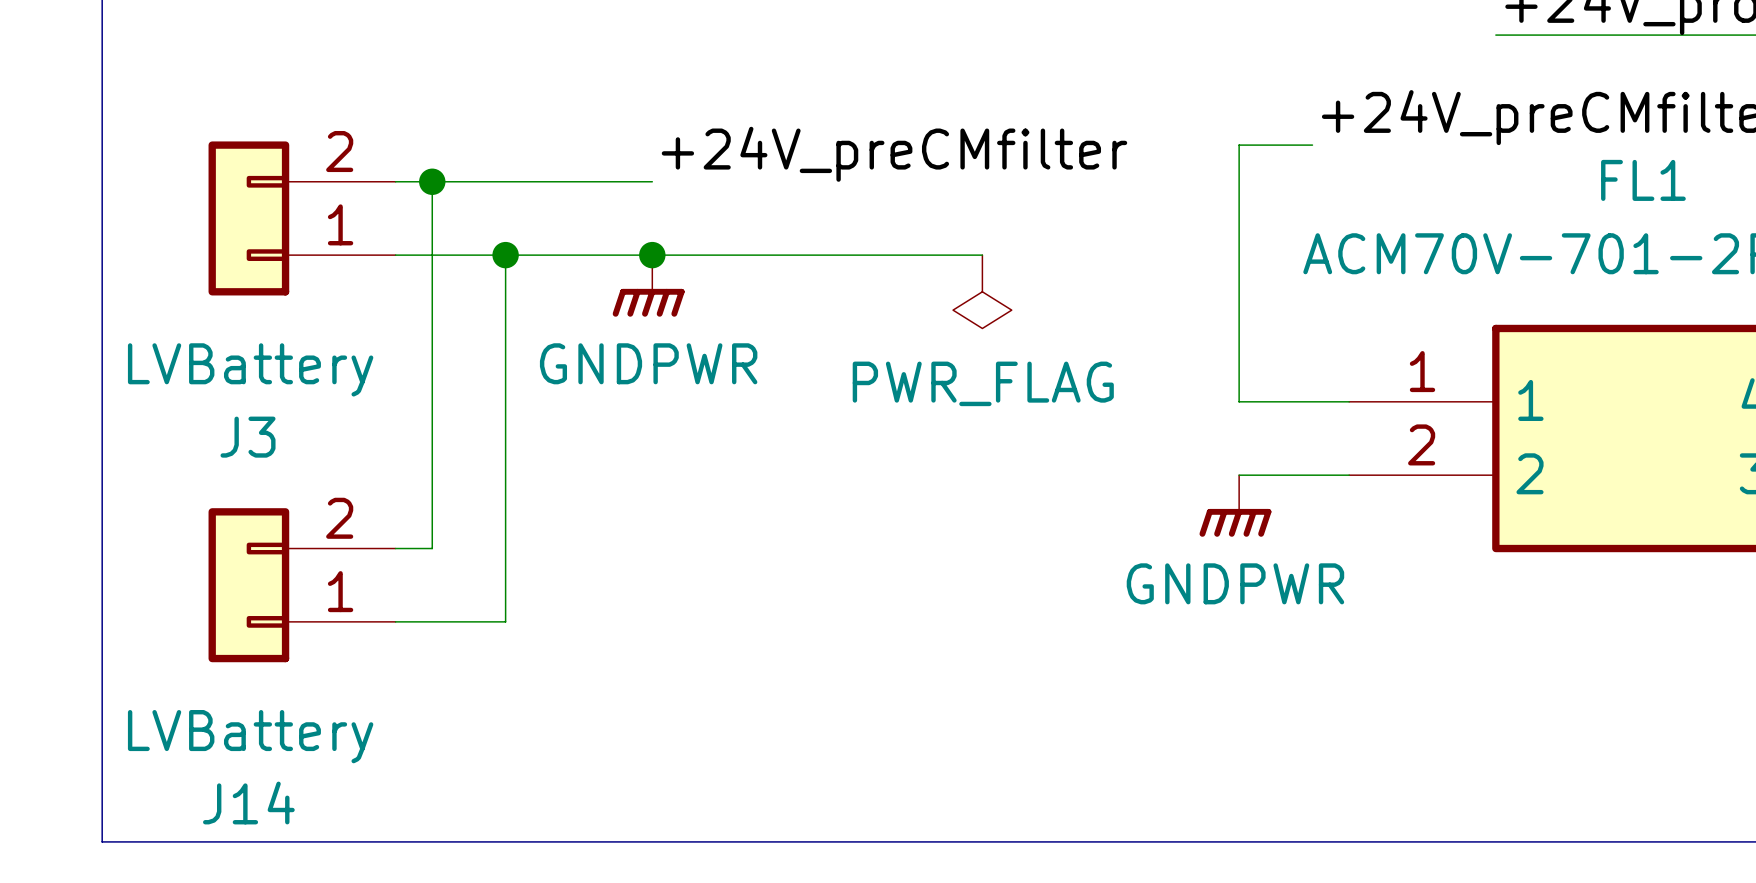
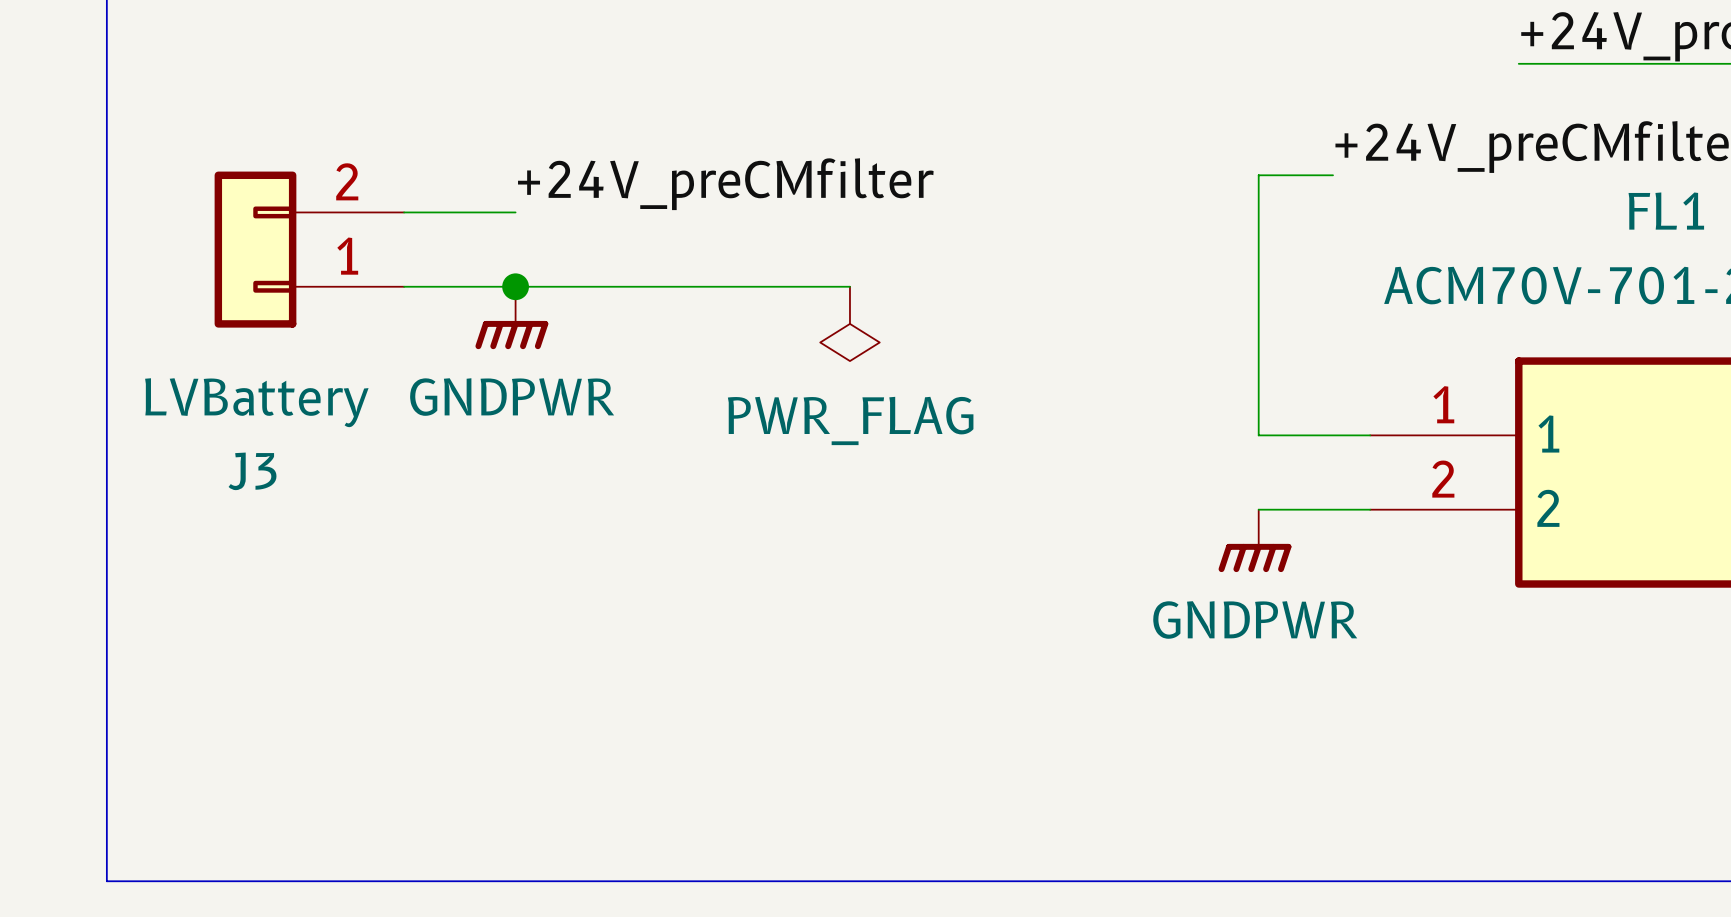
label position: +24V_preCMfilter (894, 154) -> +24V_preCMfilter (725, 184)
wire: (432, 181) (432, 548) (395, 548) -> none
junction: (432, 181) -> none
wire: (505, 181) (652, 181) -> none
wire: (505, 255) (505, 621) (395, 621) -> none
junction: (652, 255) -> none
wire: (835, 255) (982, 255) -> none
power symbol position: GNDPWR (648, 285) -> GNDPWR (511, 317)
power symbol position: PWR_FLAG (982, 291) -> PWR_FLAG (849, 323)
J14: LVBattery (302, 585) -> none

